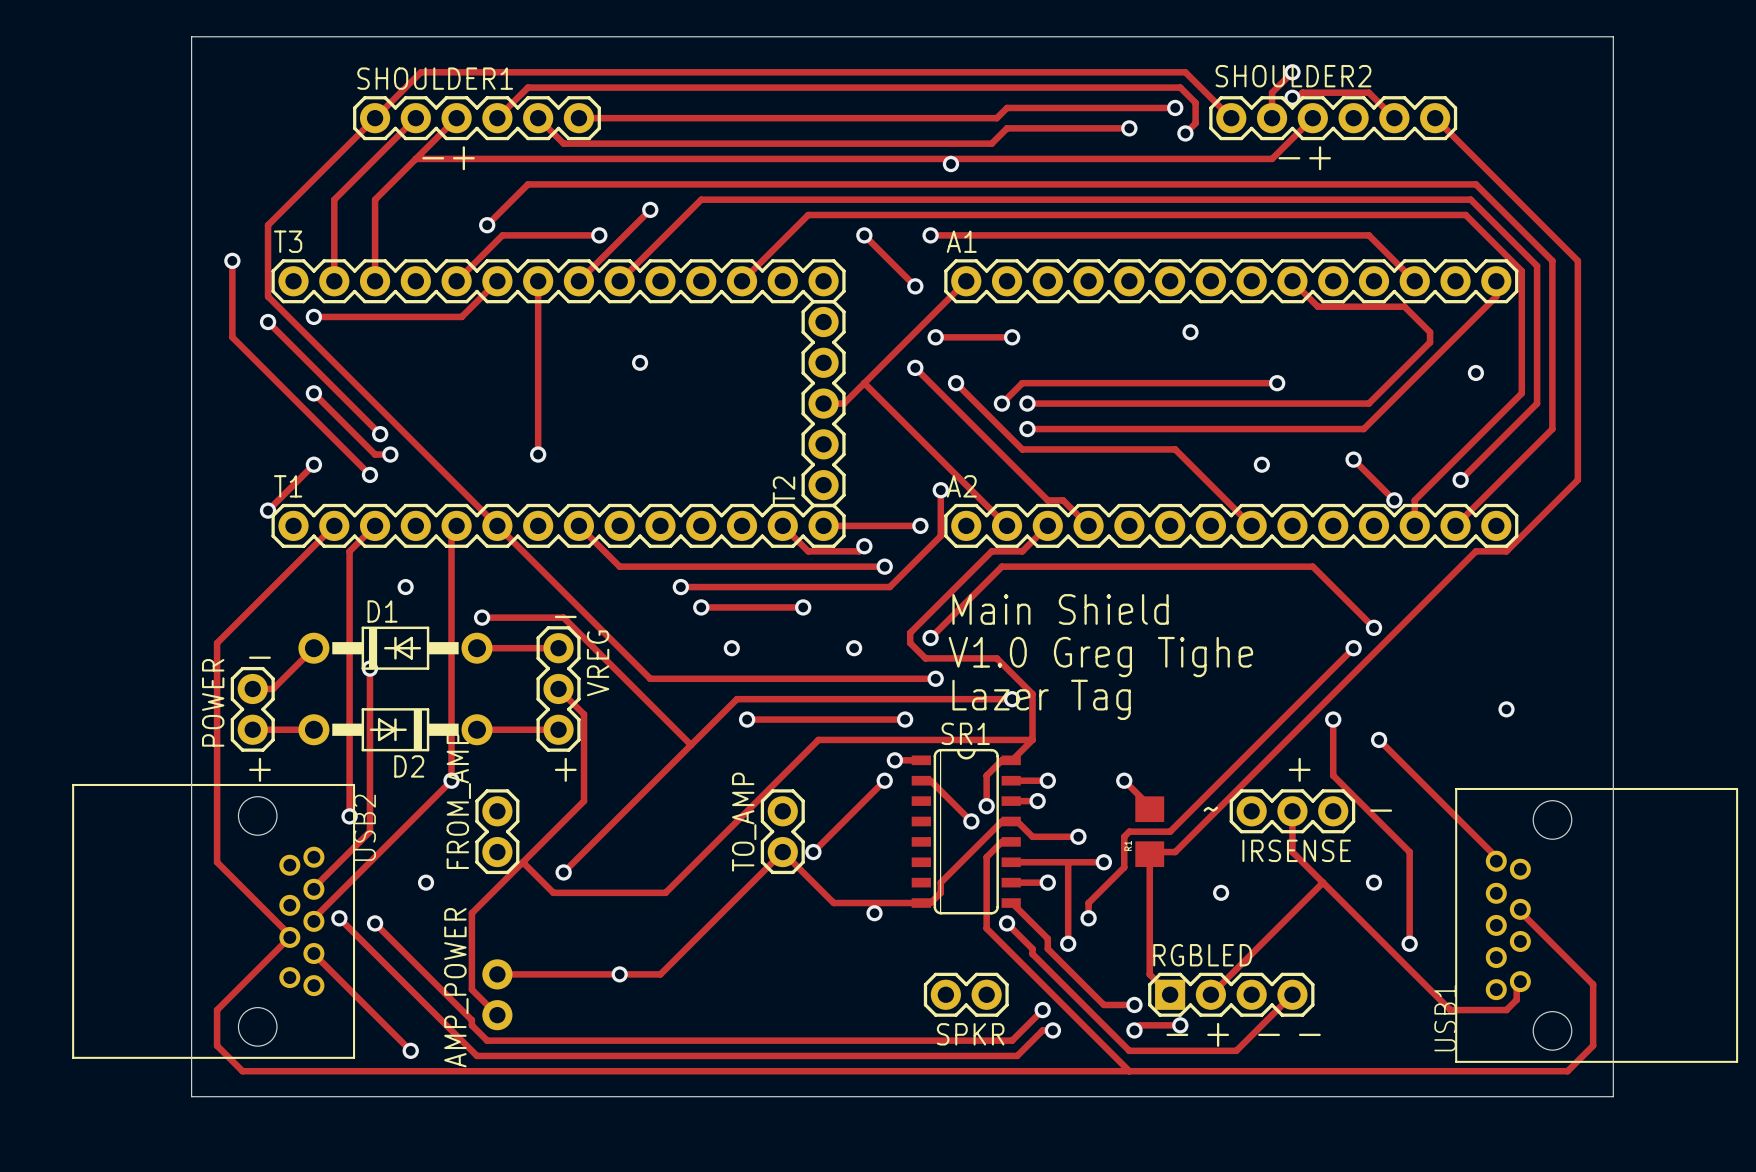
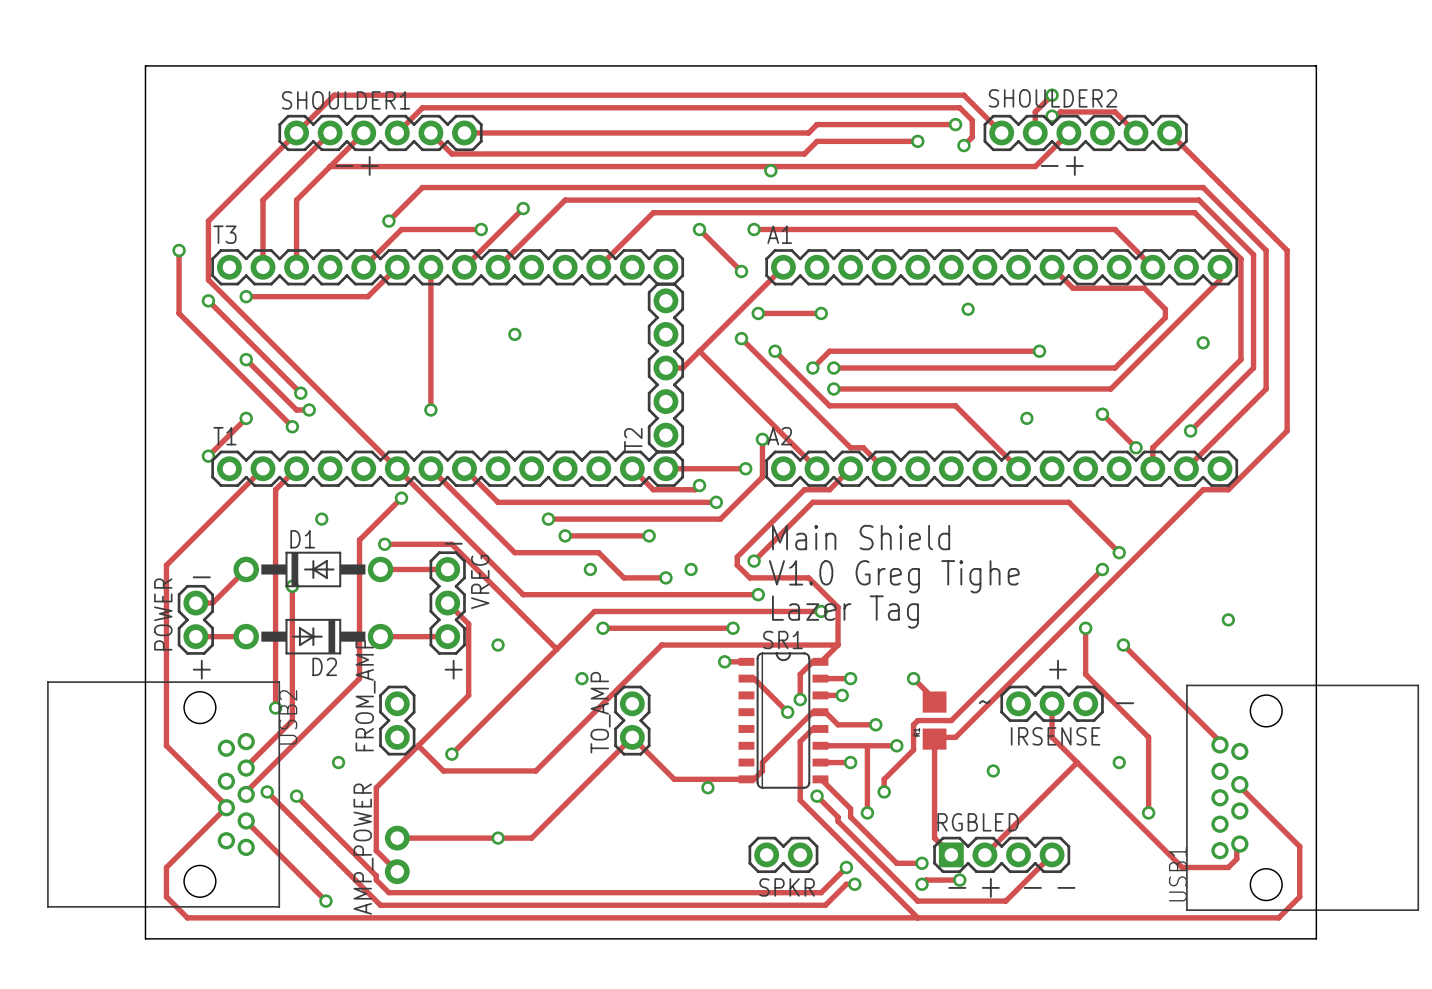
track: (456, 525) (451, 530) (451, 612) -> (401, 498) (359, 540)
track: none -> (430, 468) (514, 552) (598, 552) (623, 577) (665, 577)
via: none -> (401, 498)
via: none -> (665, 577)
via: none -> (498, 645)
via: (451, 780) -> none
via: none -> (581, 678)
track: (884, 780) (813, 852) -> none
via: (884, 780) -> none
via: (813, 852) -> none

